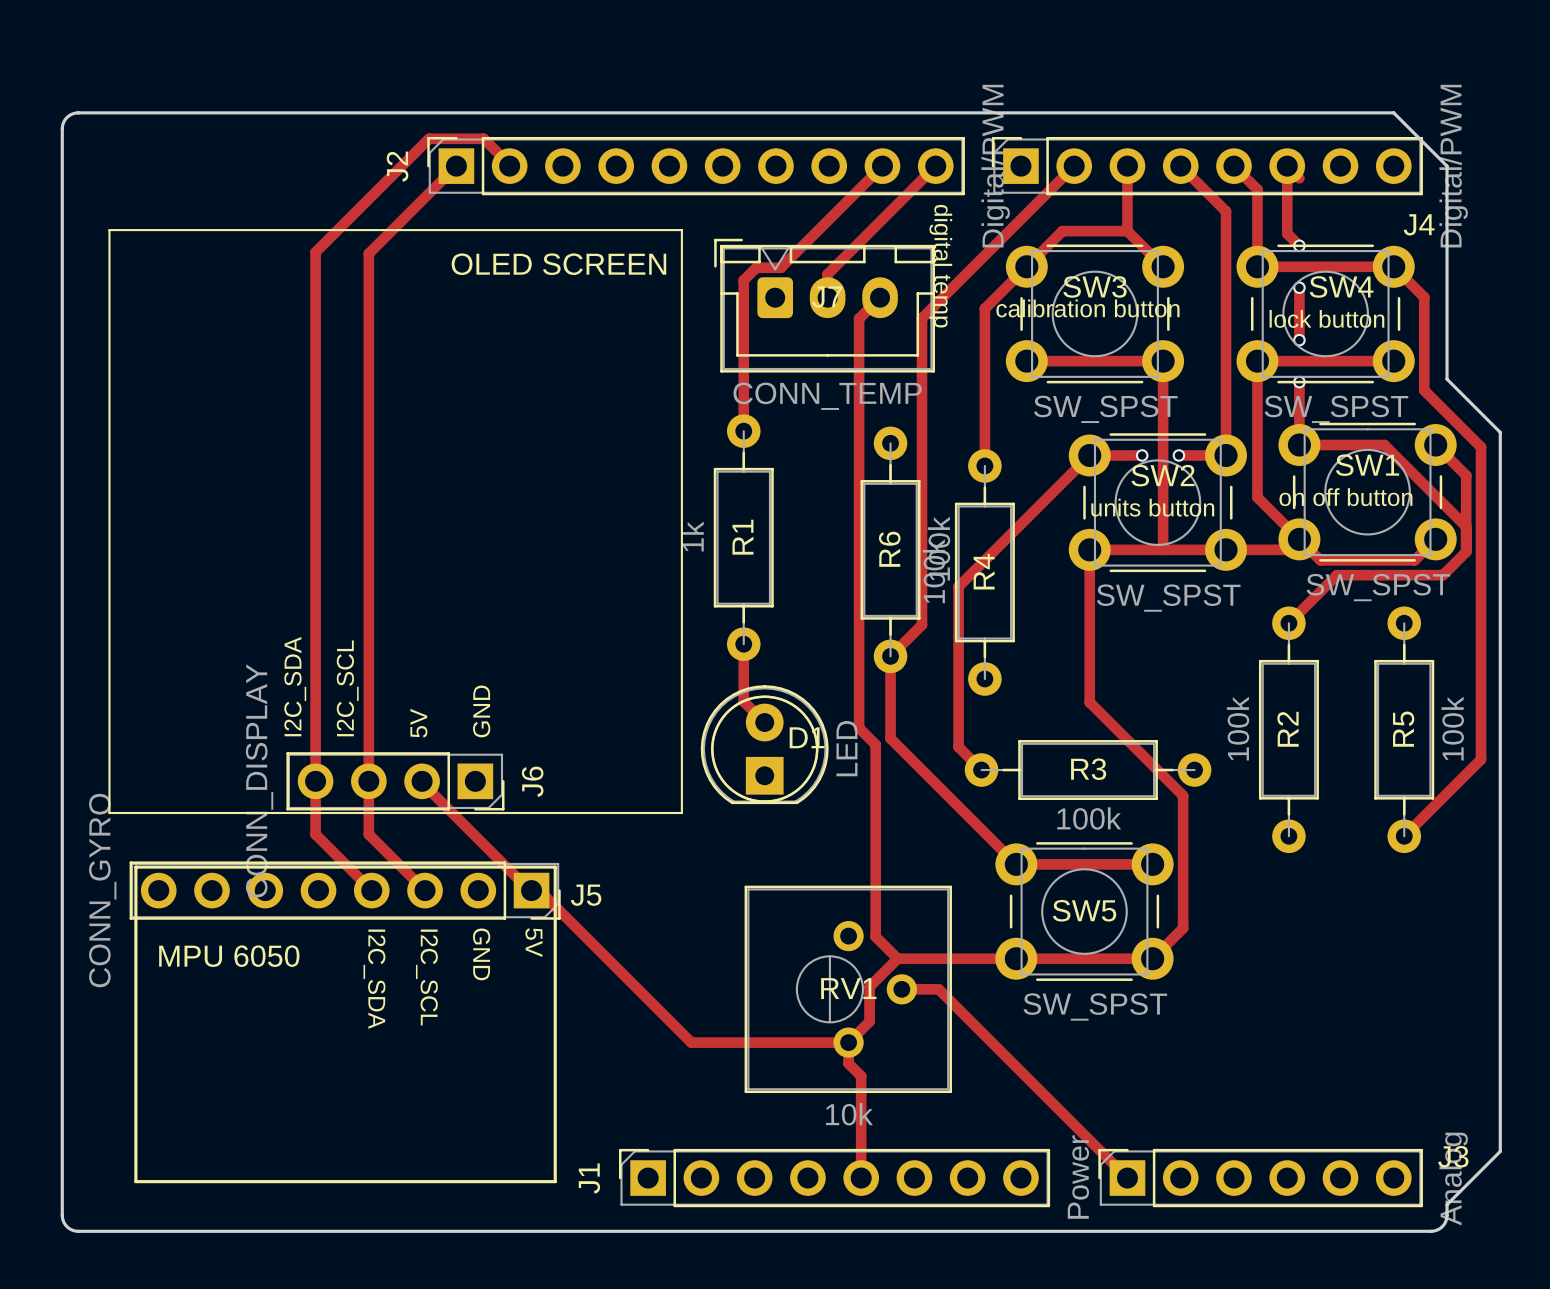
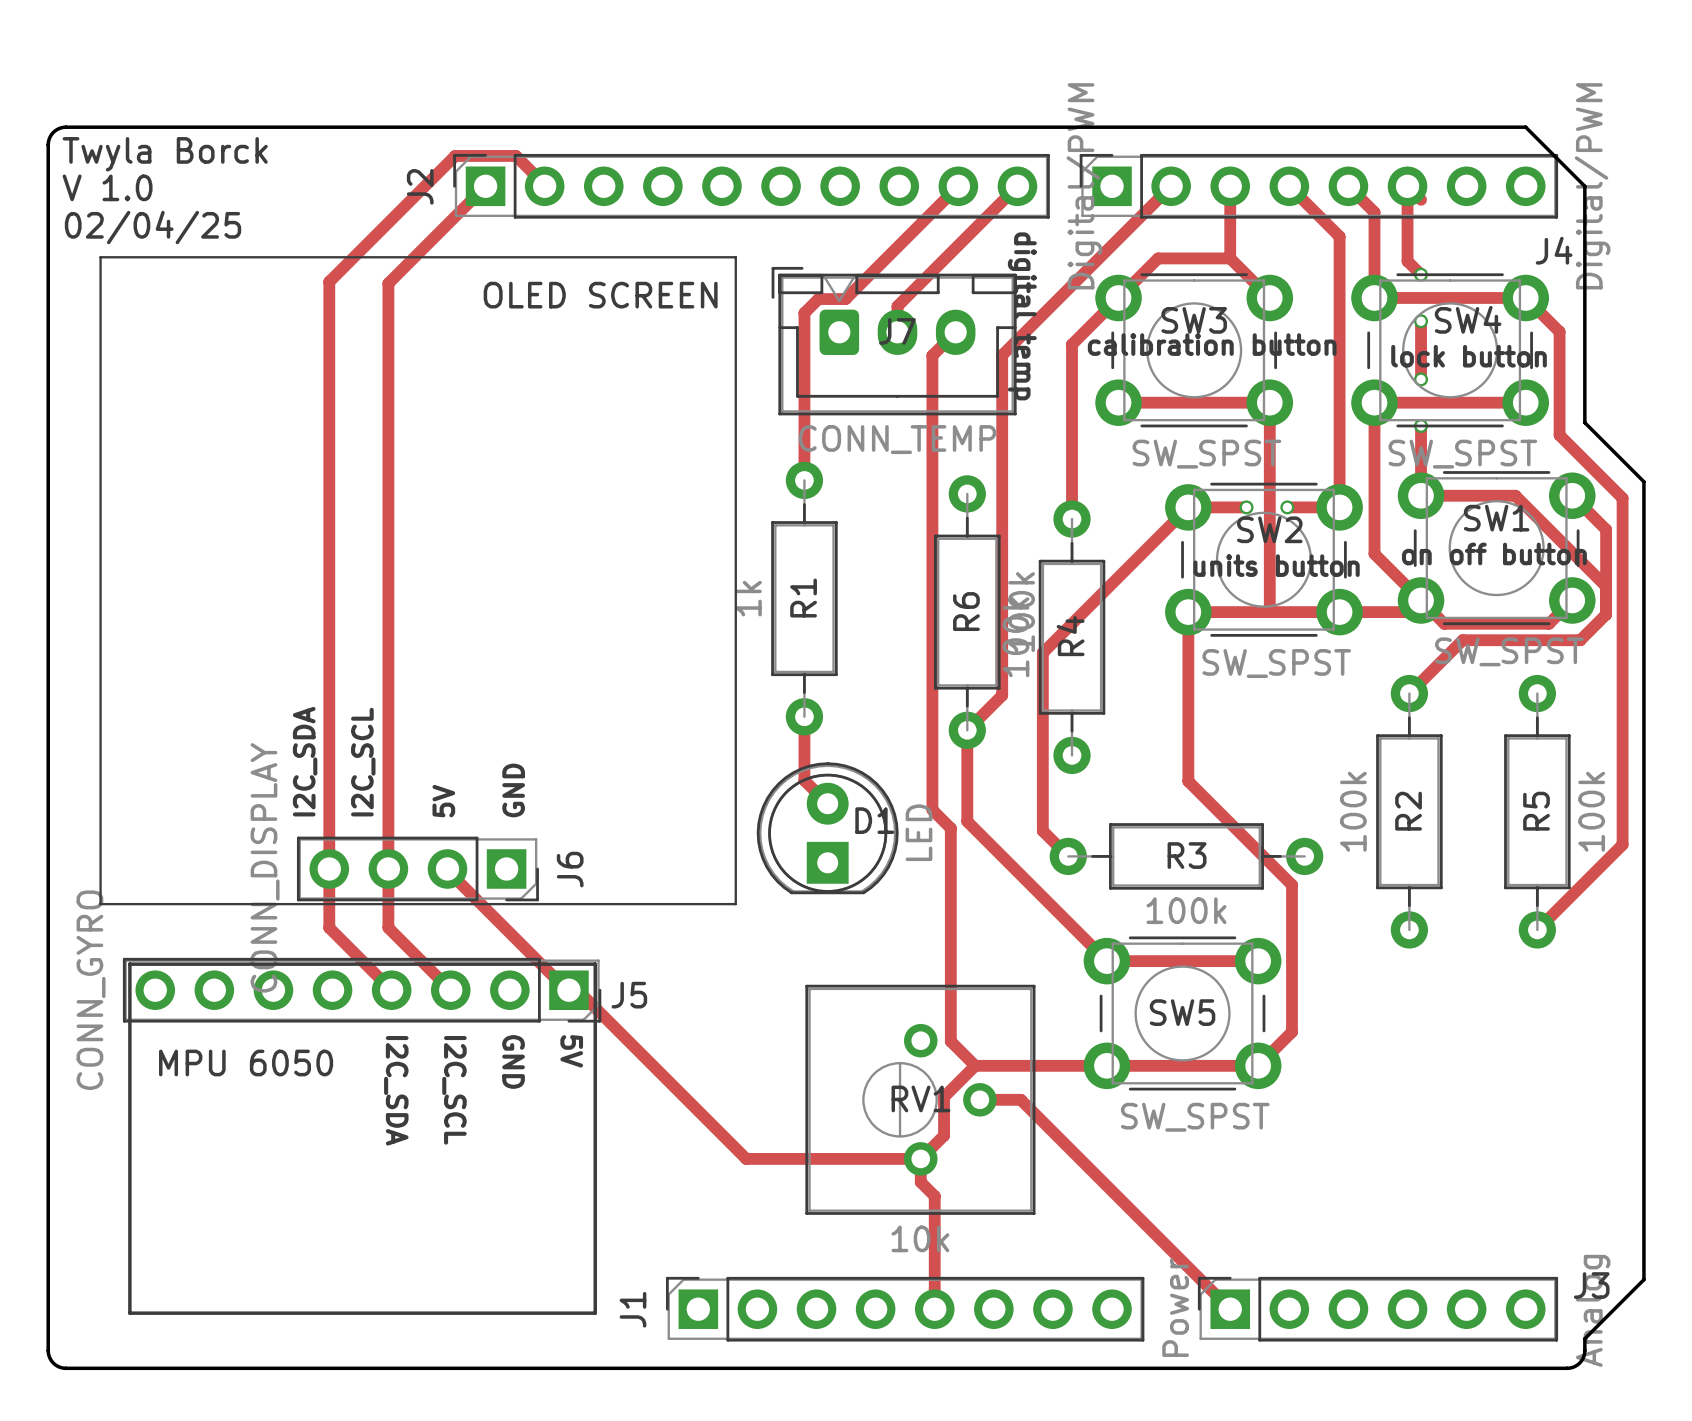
text: none -> Twyla Borck (165, 154)
text: none -> V 1.0 (107, 187)
text: none -> 02/04/25 (153, 227)

